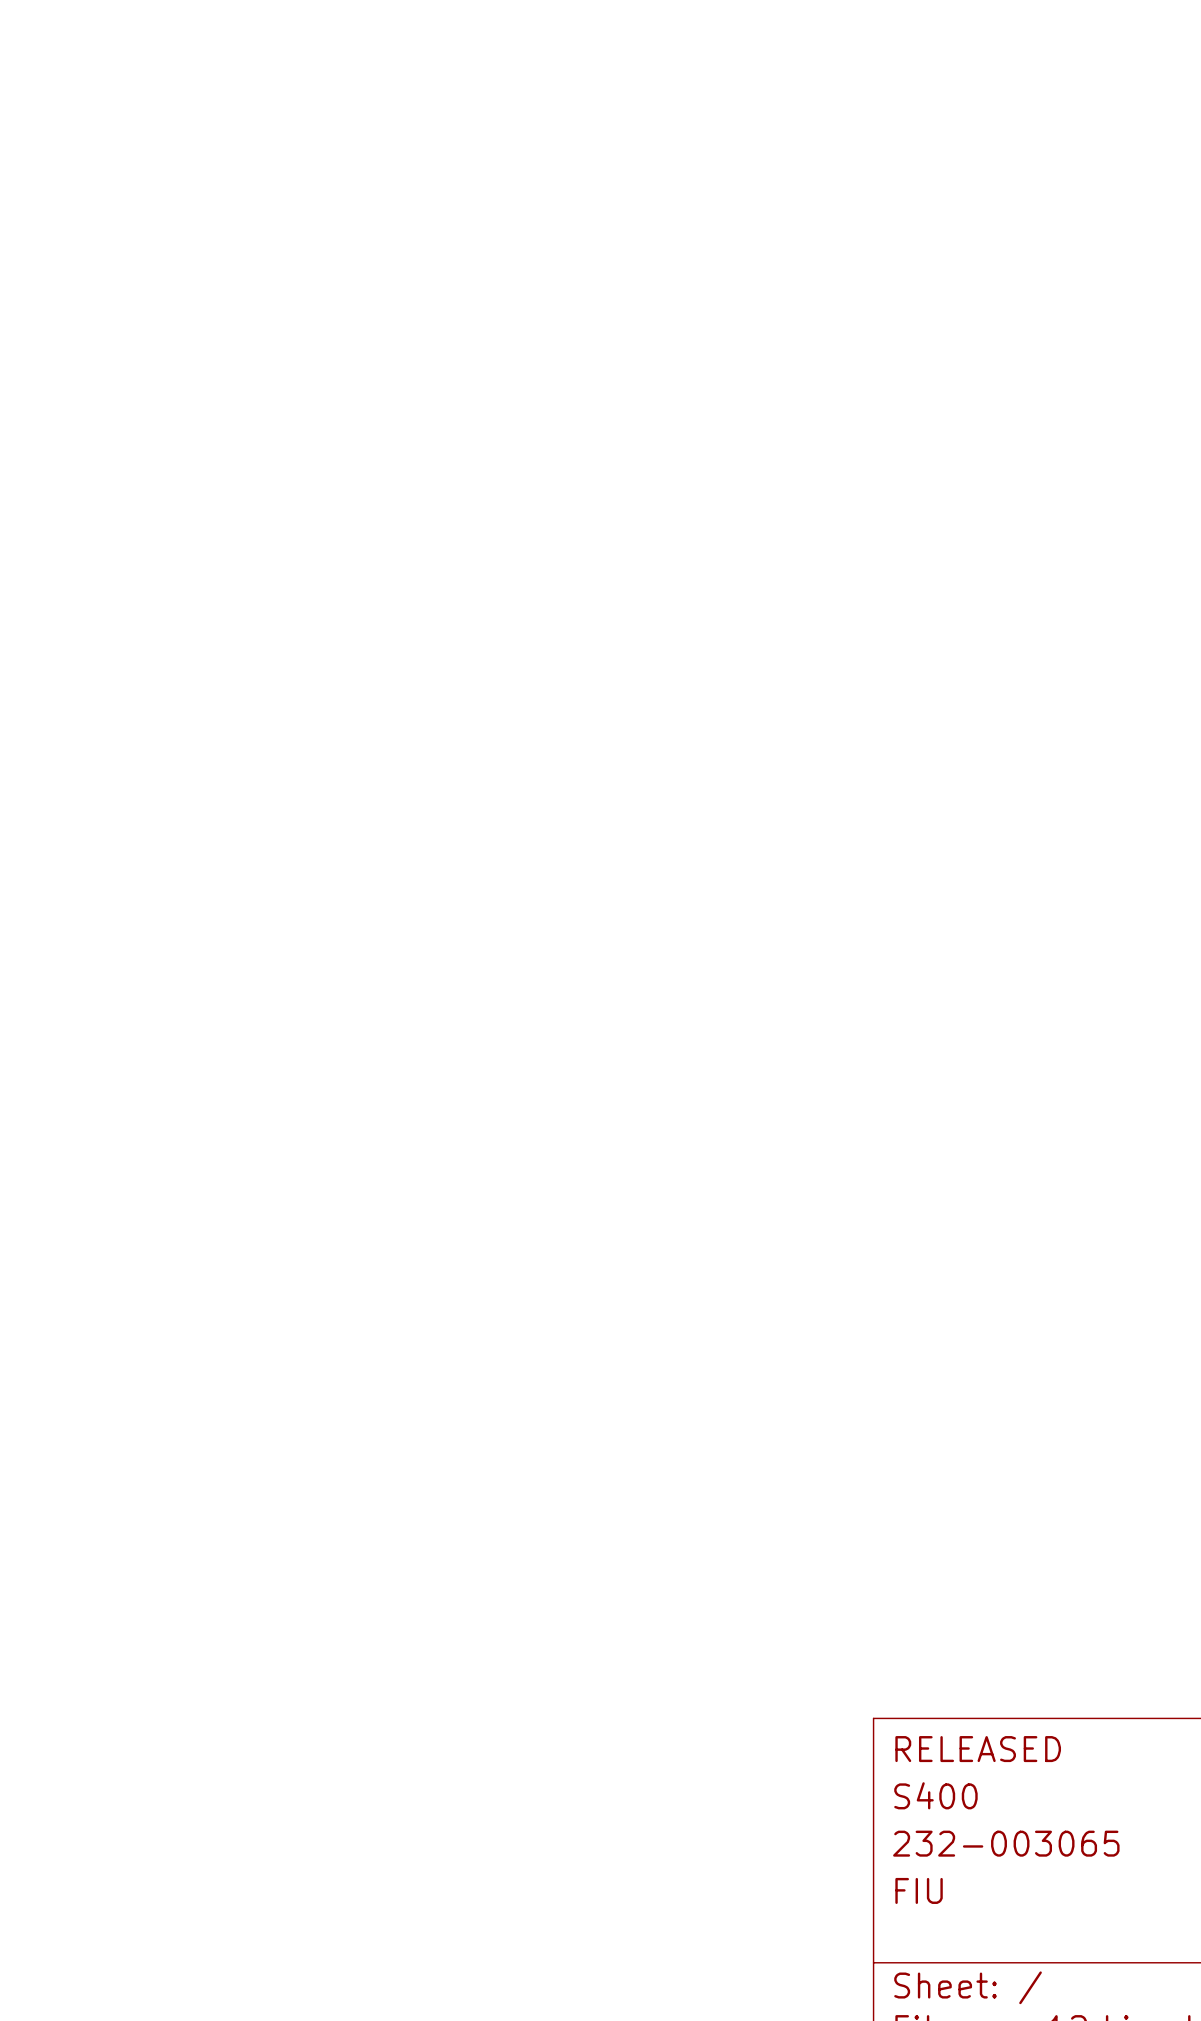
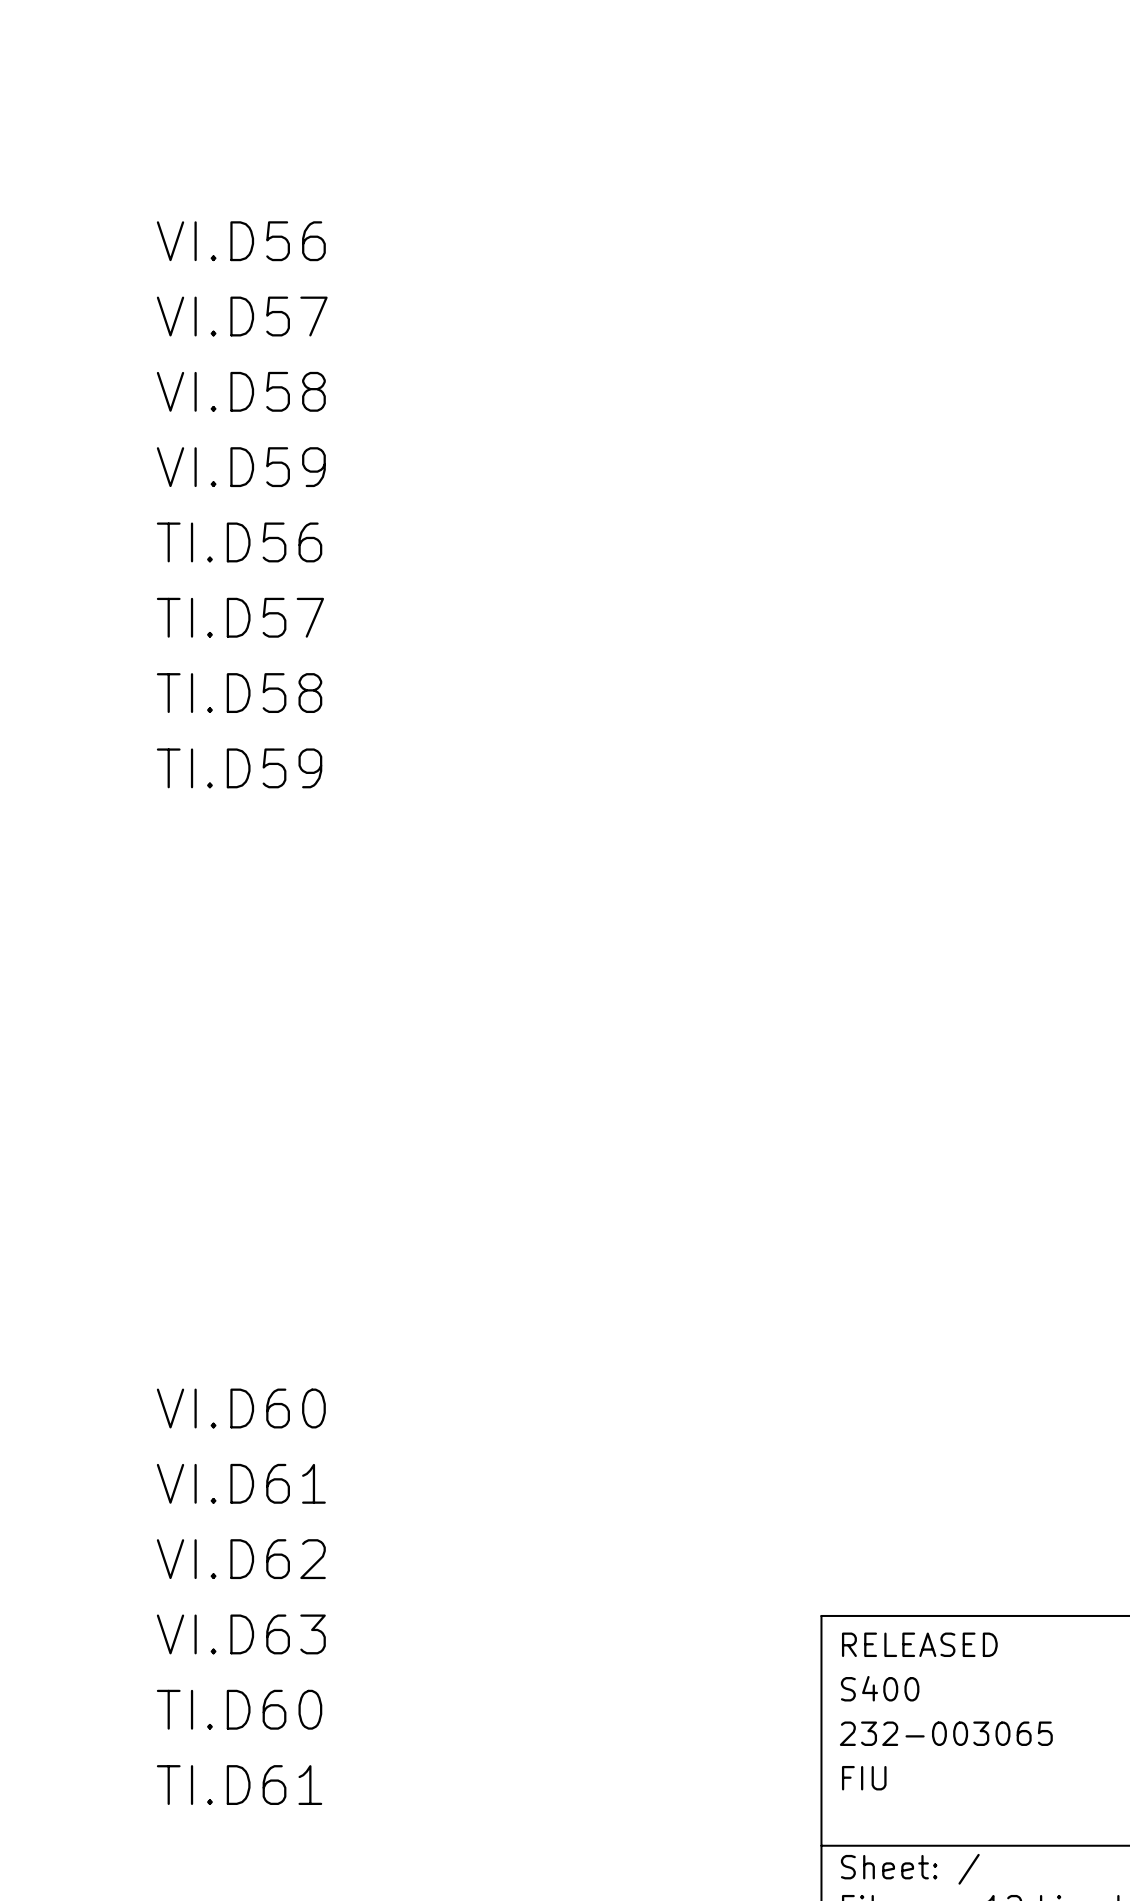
label: none -> VI.D56 (241, 241)
label: none -> VI.D57 (242, 316)
label: none -> VI.D58 (241, 391)
label: none -> VI.D59 (241, 467)
label: none -> TI.D56 (239, 542)
label: none -> TI.D57 (240, 617)
label: none -> TI.D58 (239, 693)
label: none -> TI.D59 (239, 768)
label: none -> VI.D60 (241, 1408)
label: none -> VI.D61 (241, 1483)
label: none -> VI.D62 (241, 1559)
label: none -> VI.D63 (241, 1634)
label: none -> TI.D60 (239, 1709)
label: none -> TI.D61 (239, 1785)

